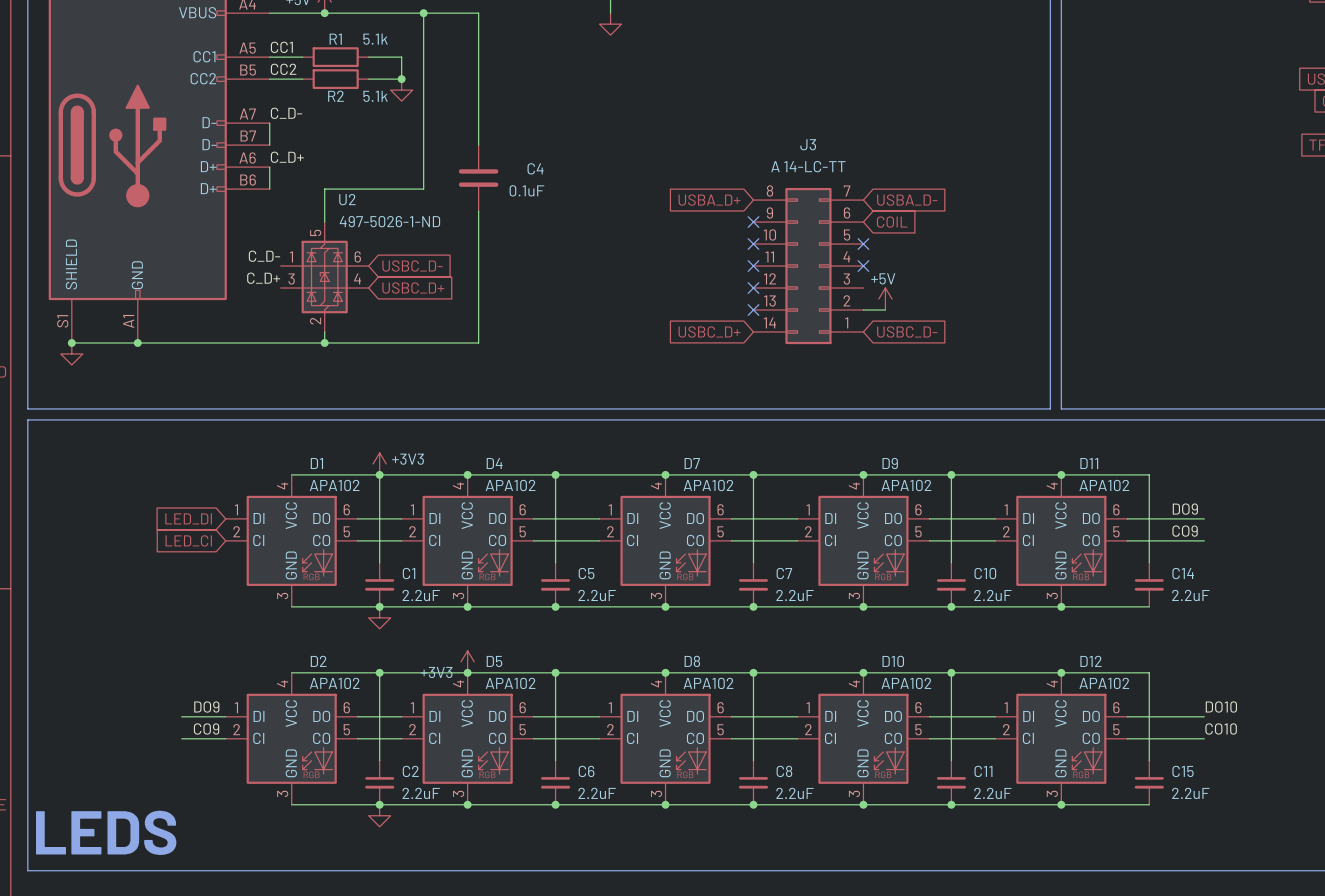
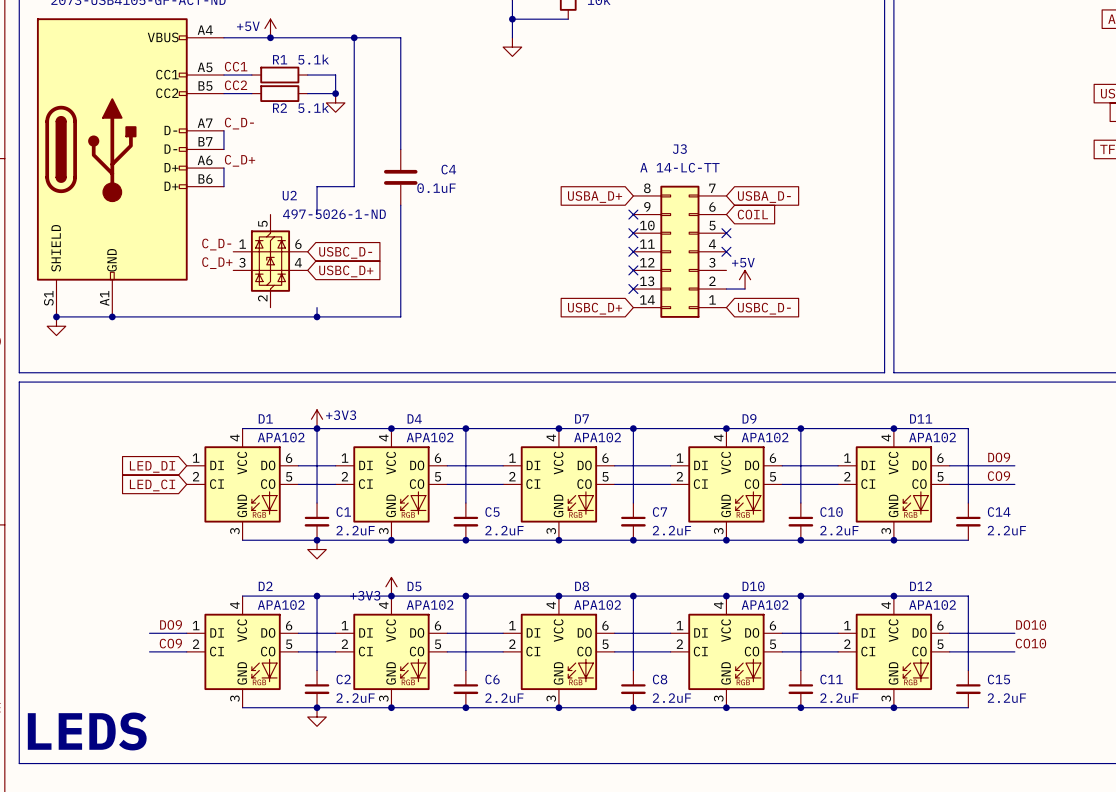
wire: (379, 189) (324, 189) (324, 222) -> (317, 186) (317, 214)
wire: (324, 331) (324, 342) -> (317, 307) (317, 316)
junction: (324, 342) -> none
junction: none -> (317, 316)

